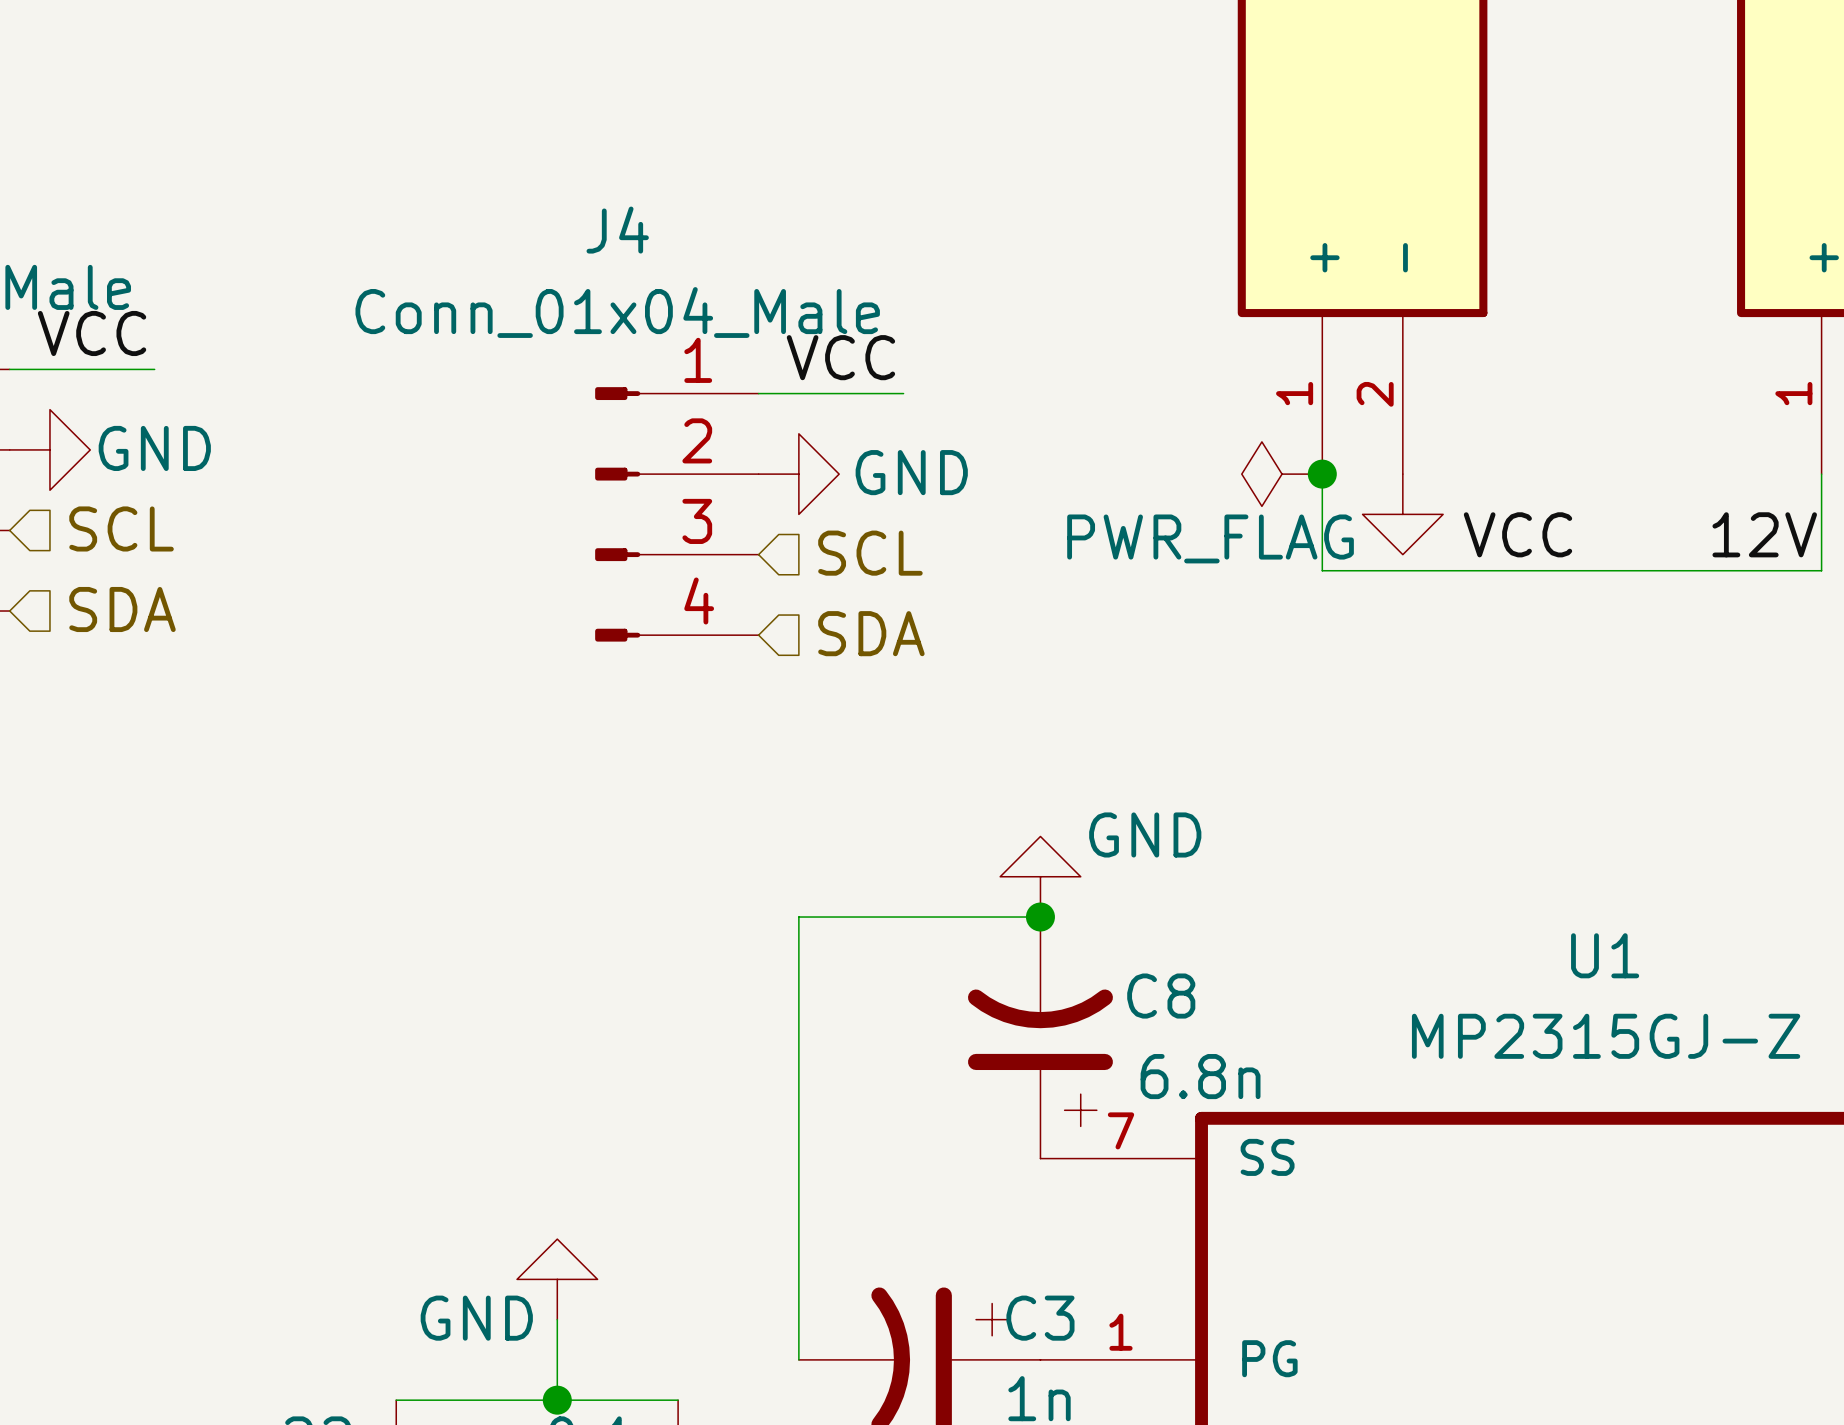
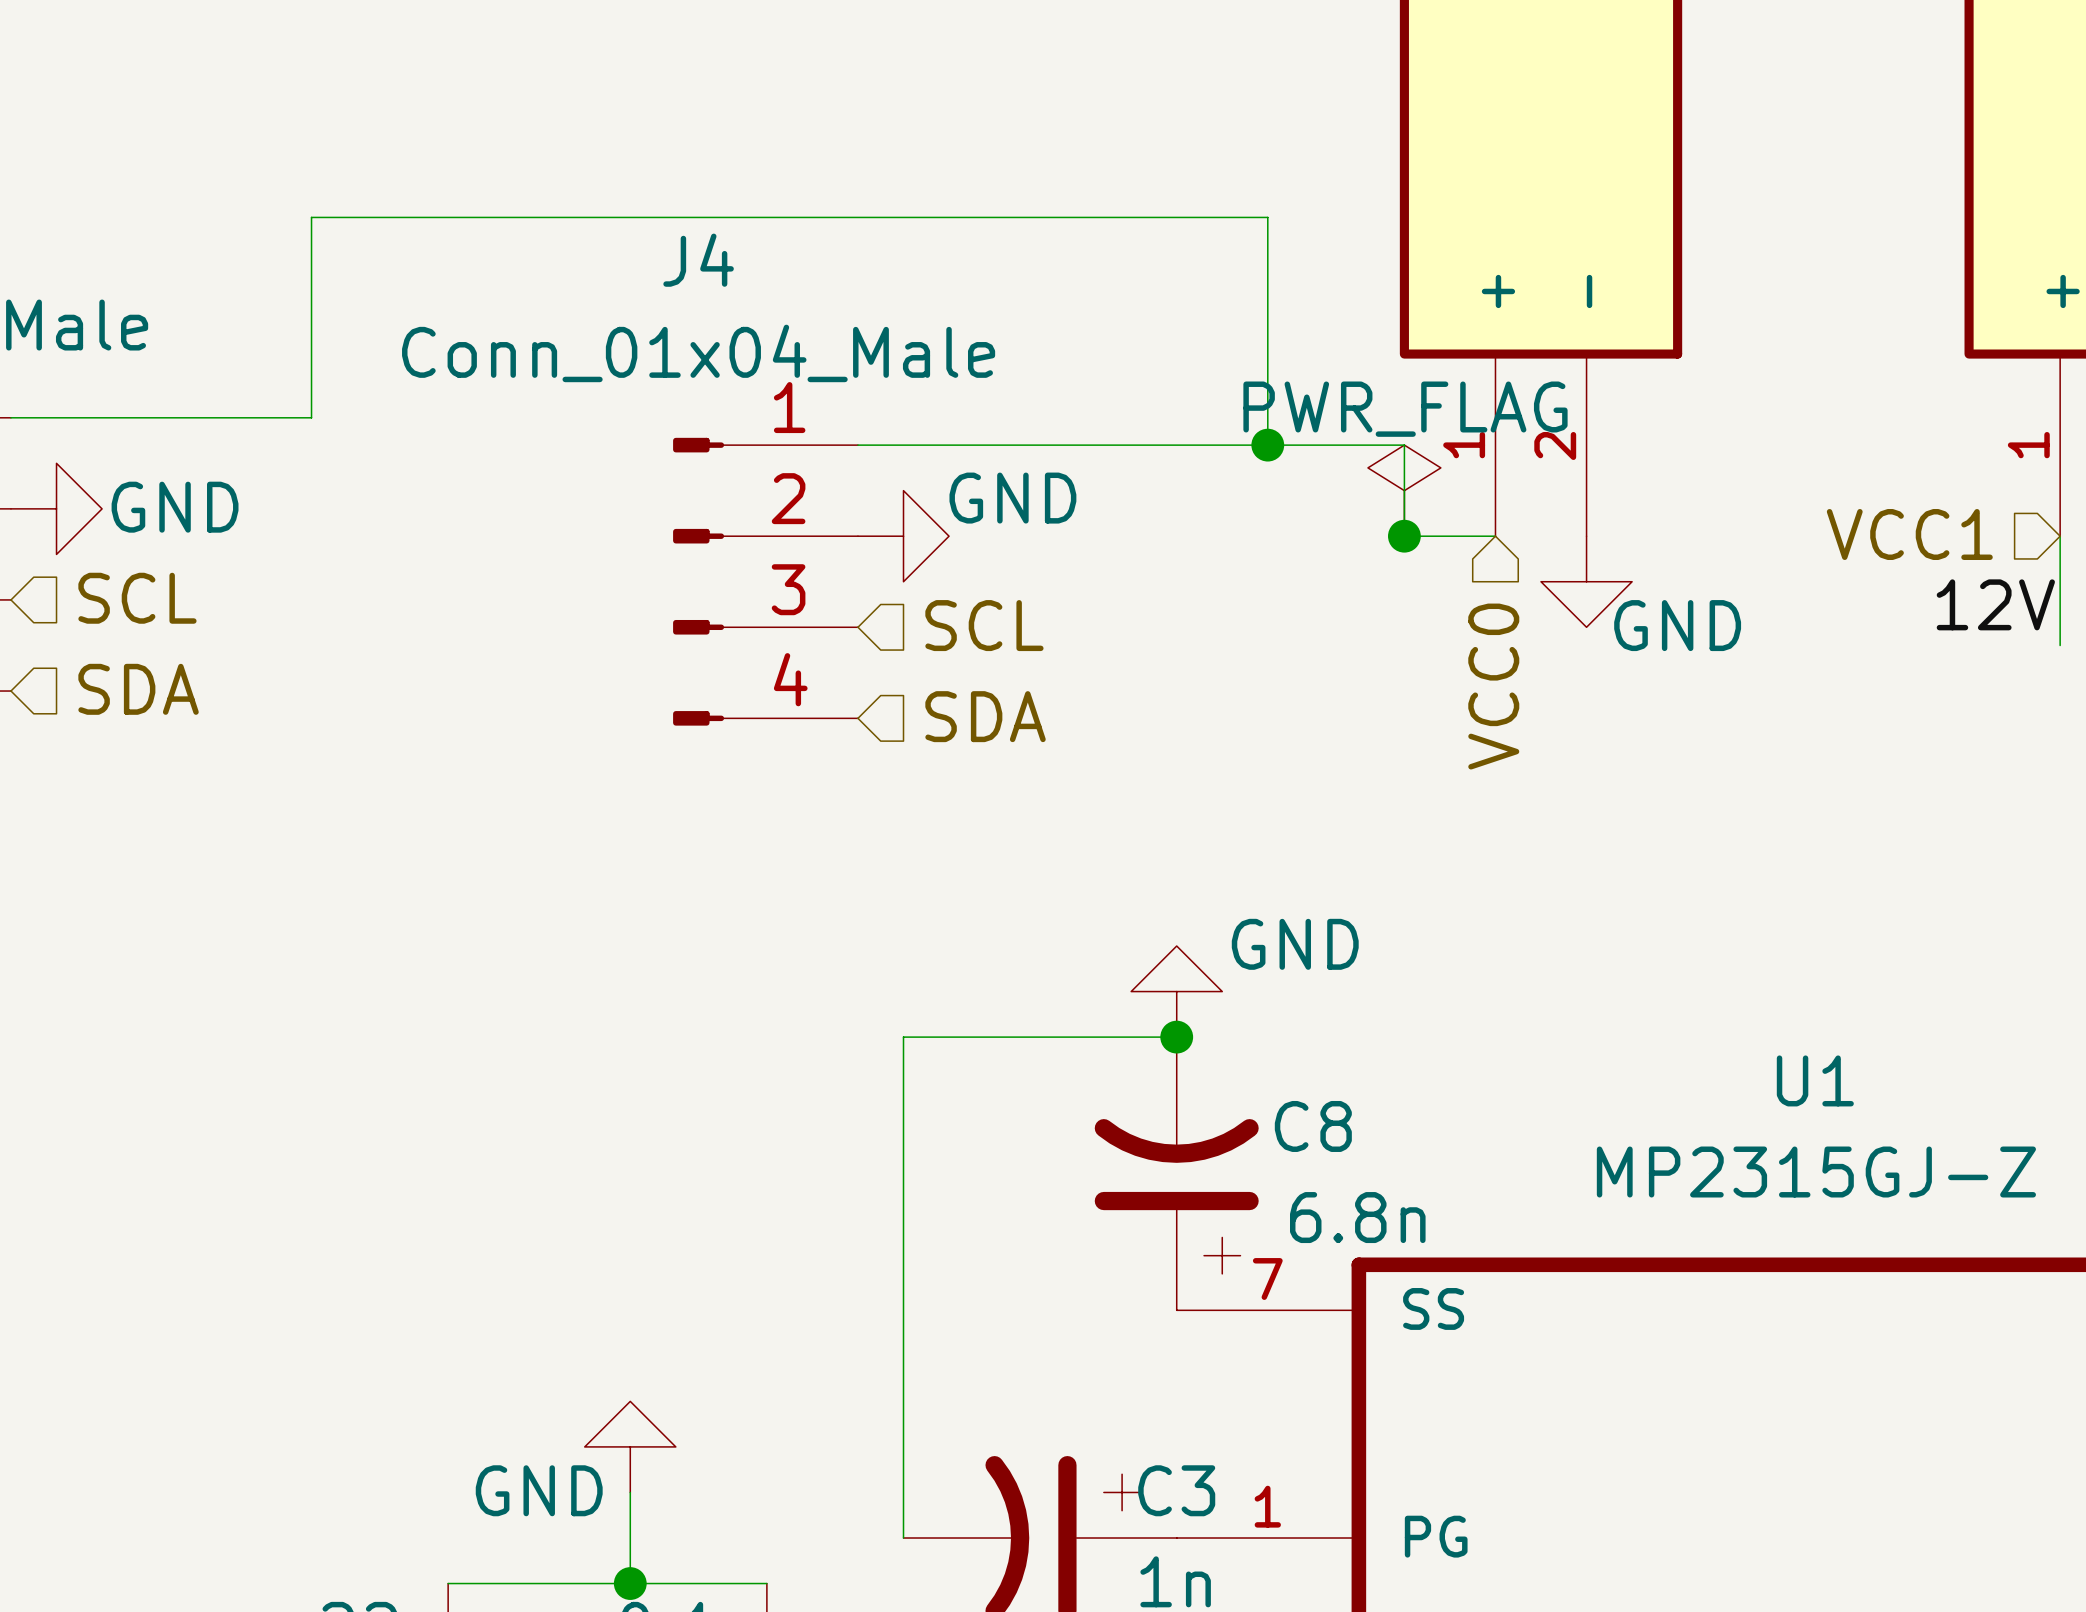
label: VCC (92, 333) -> none
label: VCC (840, 357) -> none
wire: none -> (174, 417) (311, 417) (311, 217) (1267, 217) (1267, 445)
junction: none -> (1267, 445)
power symbol text position: GND (911, 472) -> GND (1012, 498)
hierarchical label: none -> VCC1 (1909, 534)
power symbol rotation: 0° (1282, 474) -> 90° clockwise (1404, 490)
power symbol position: PWR_FLAG (1282, 474) -> PWR_FLAG (1404, 490)
wire: (1322, 474) (1322, 570) (1821, 570) -> (1495, 536) (1404, 536) (1404, 445) (1021, 445)
junction position: (1322, 474) -> (1404, 536)
label: VCC (1517, 534) -> none
power symbol text position: PWR_FLAG (1210, 538) -> PWR_FLAG (1405, 409)
power symbol text: none -> GND (1677, 625)
hierarchical label: none -> VCC0 (1493, 686)

